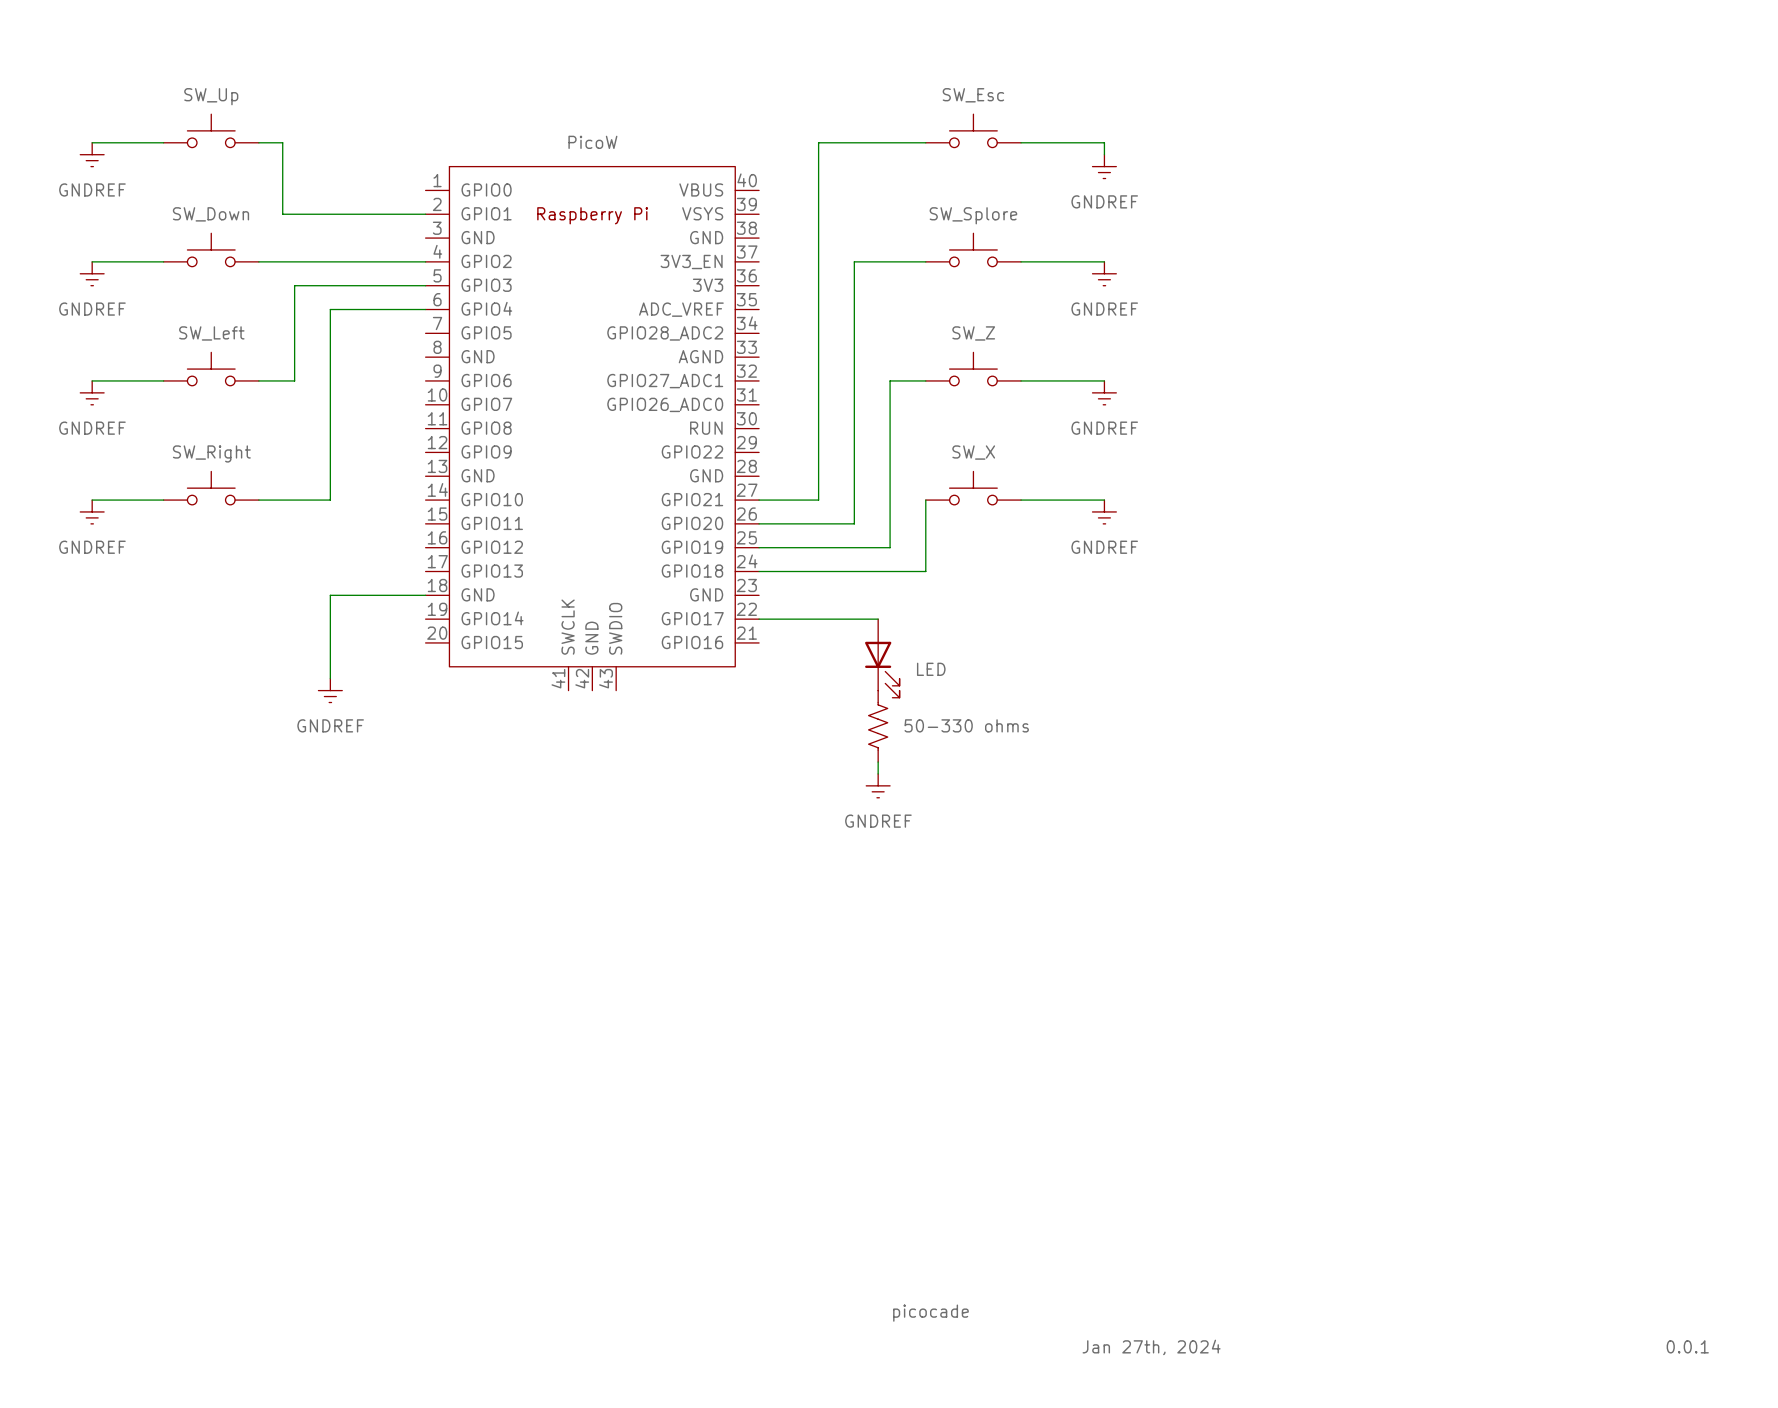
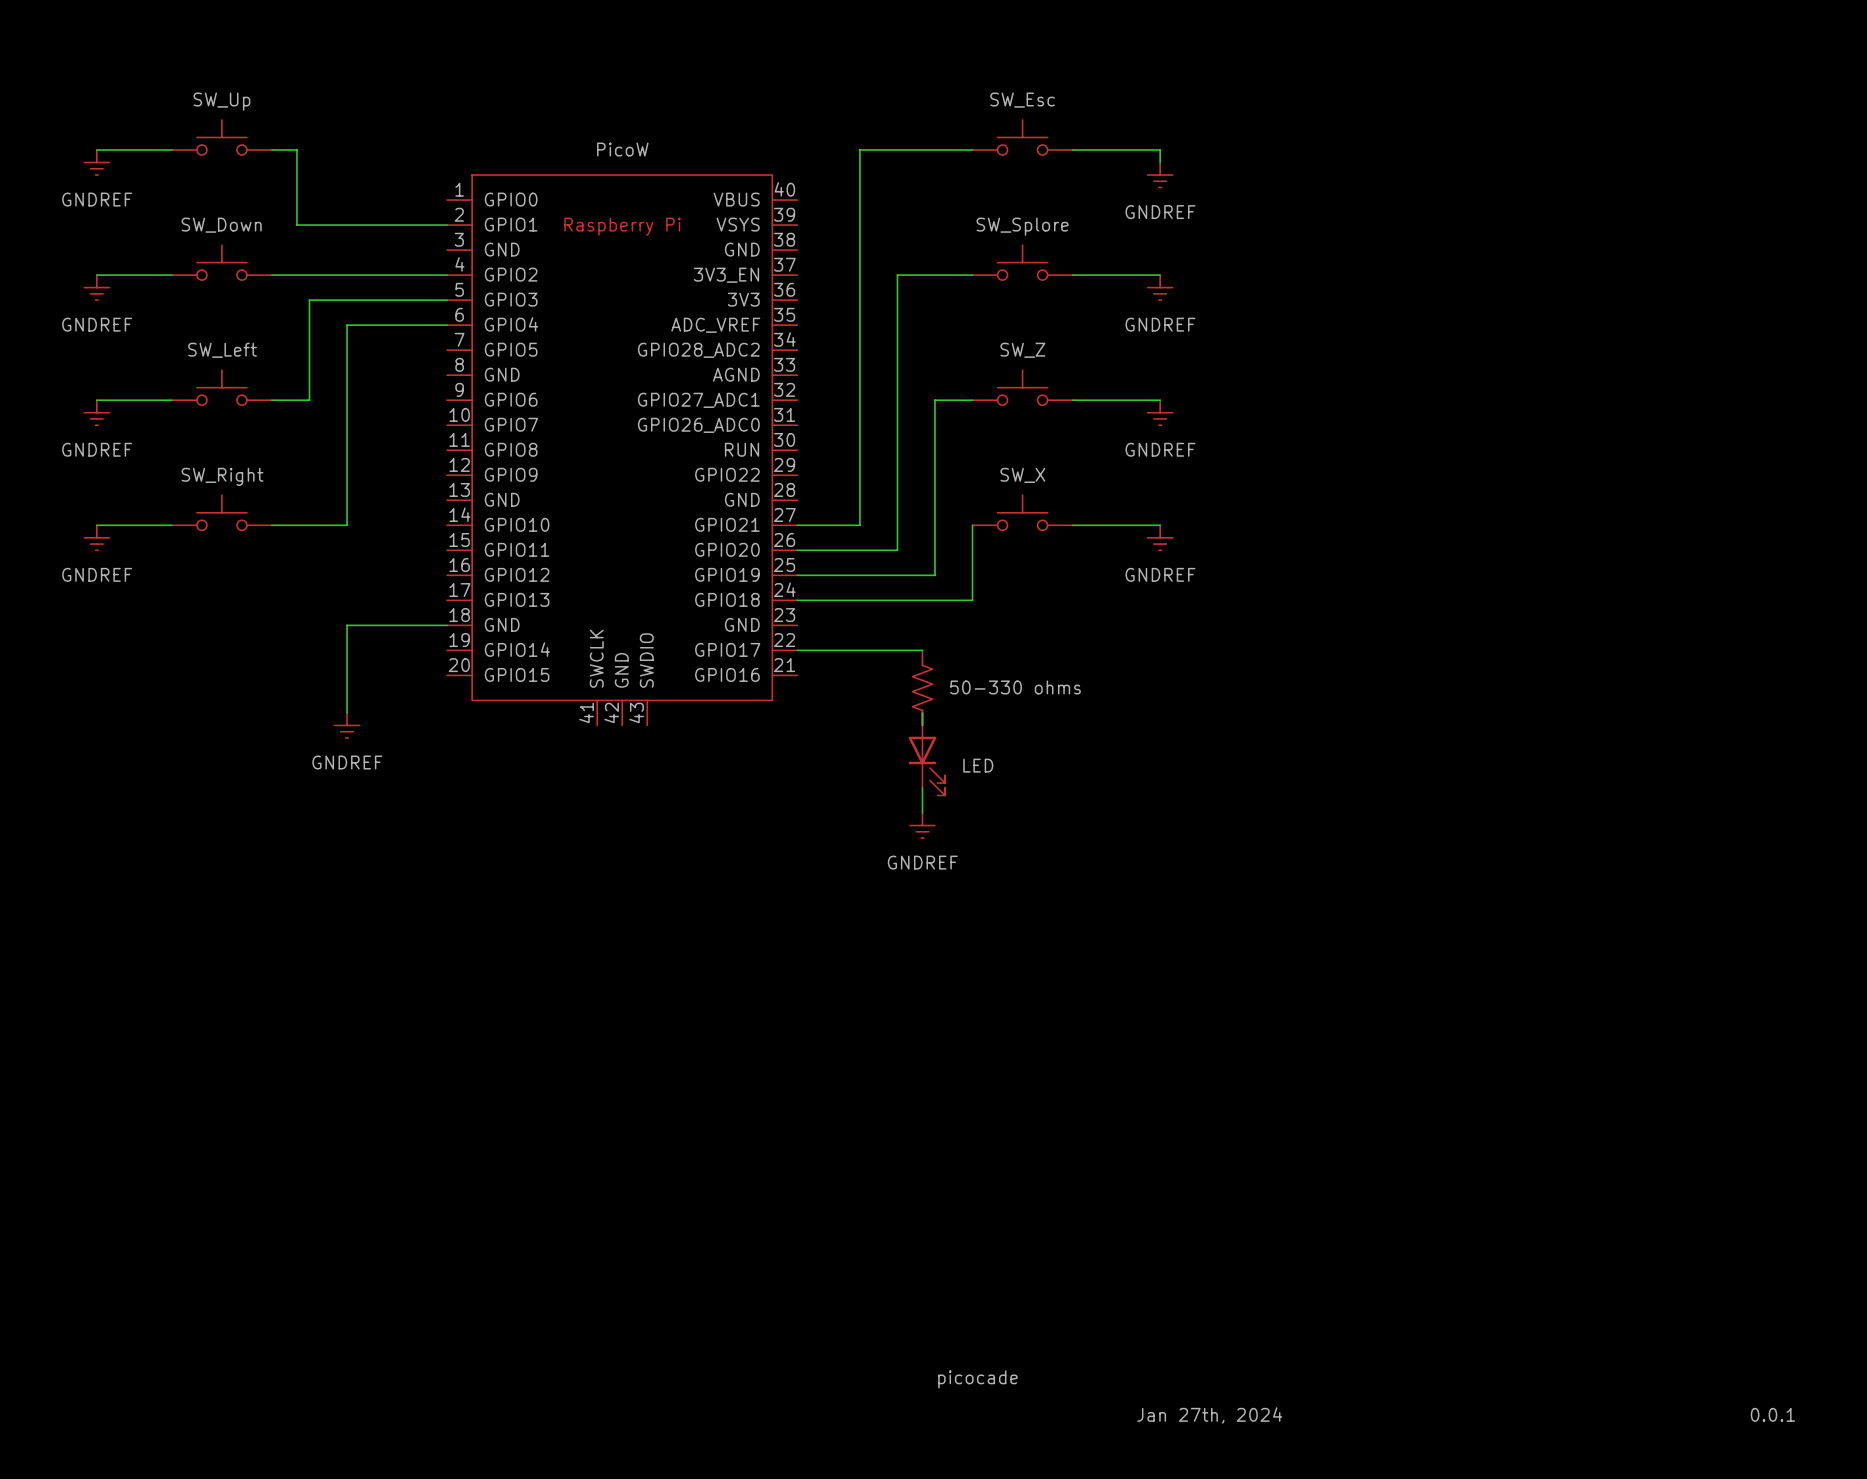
part symbol: [865, 619, 900, 698] -> [912, 650, 933, 726]
part value: LED (931, 669) -> 50-330 ohms (1015, 687)
part symbol: [868, 690, 888, 763] -> [908, 712, 946, 796]
part value: 50-330 ohms (966, 725) -> LED (978, 765)

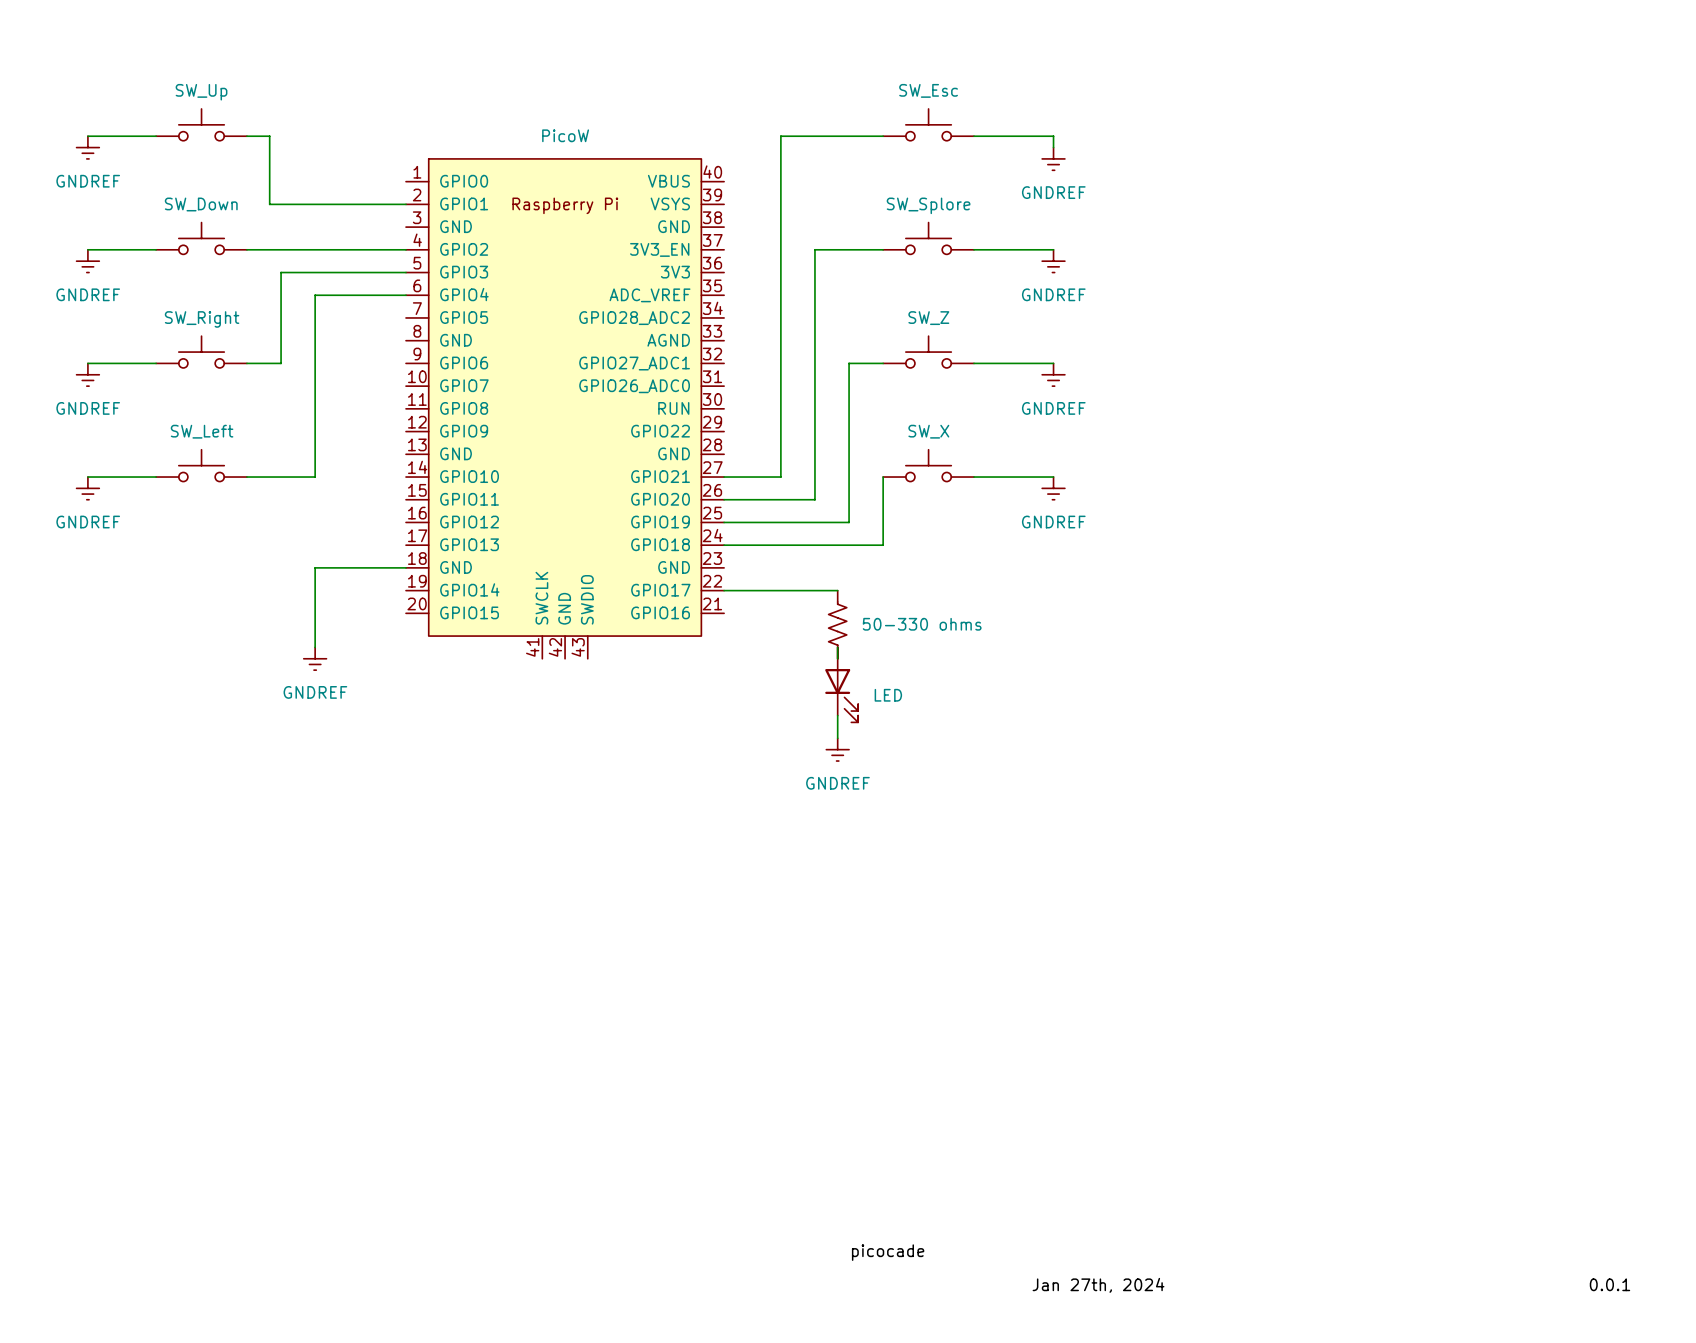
part value: SW_Left (222, 350) -> SW_Right (202, 319)
part value: SW_Right (222, 476) -> SW_Left (202, 431)

